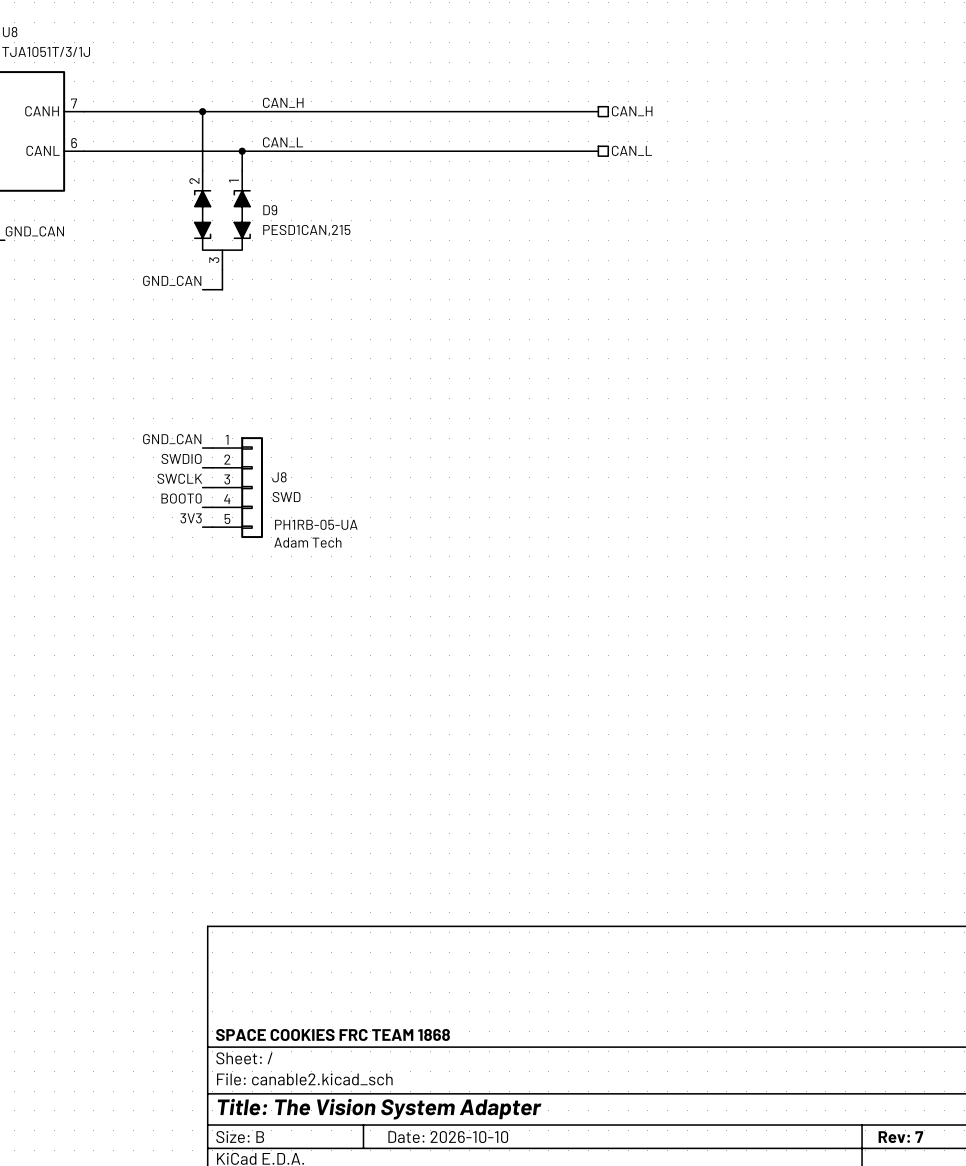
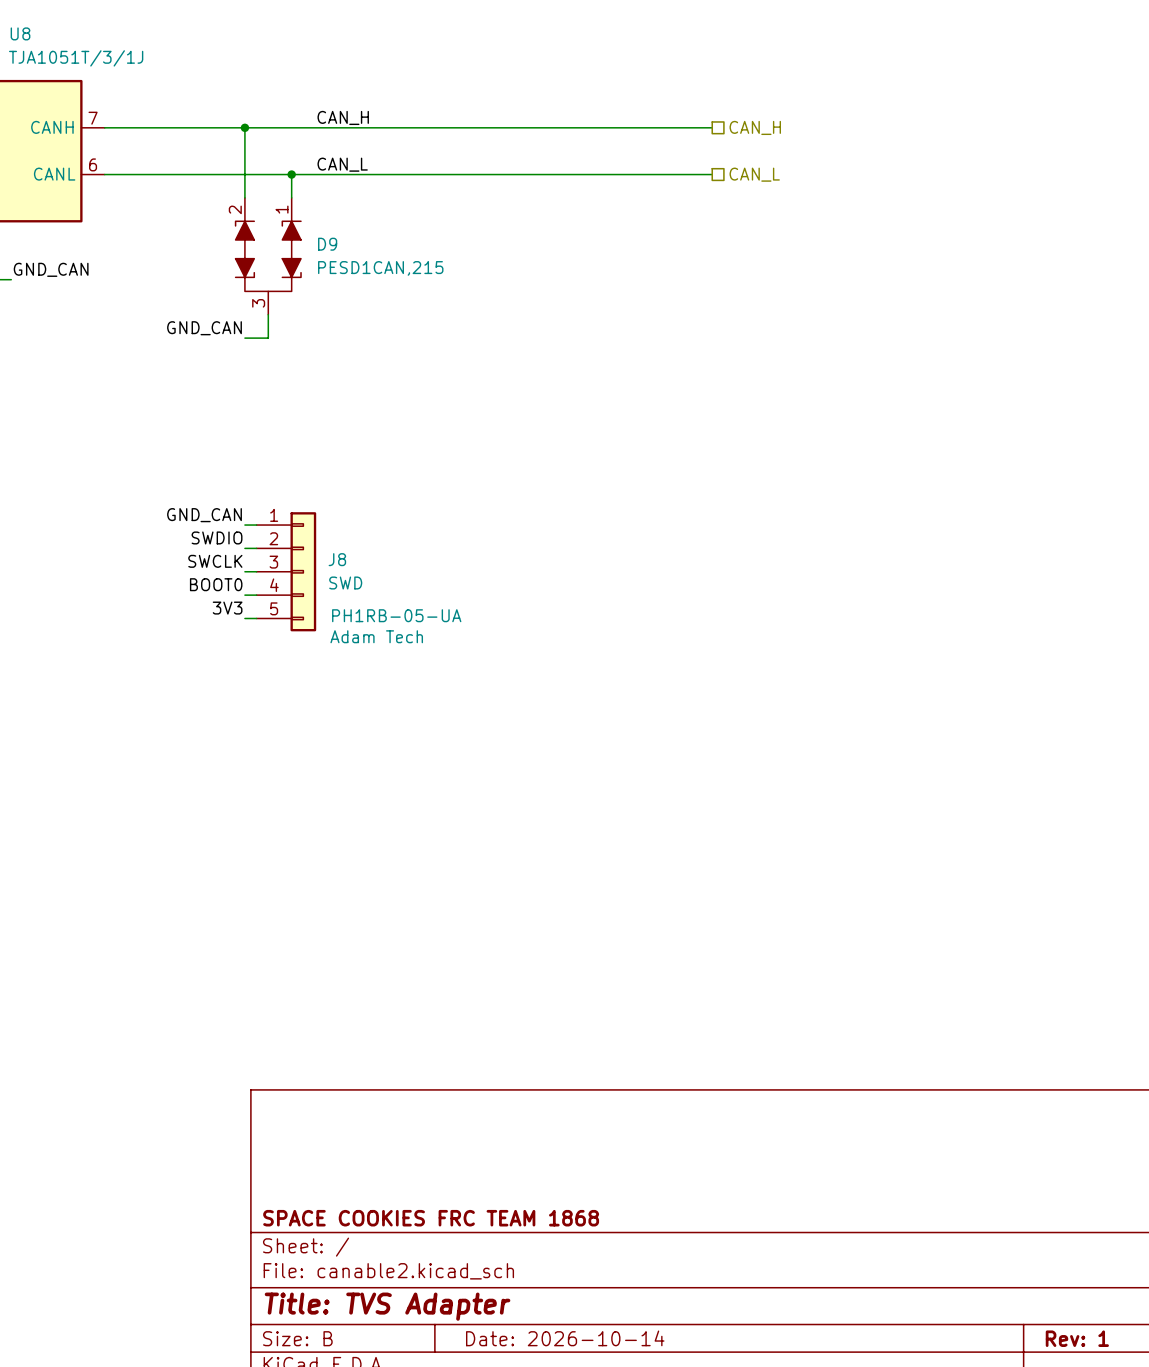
title block: Title: The Vision System Adapter (379, 1109) -> Title: TVS Adapter (387, 1306)
title block: Date: 2026-10-10 (448, 1137) -> Date: 2026-10-14 (565, 1338)
title block: Rev: 7 (900, 1137) -> Rev: 1 (1077, 1338)

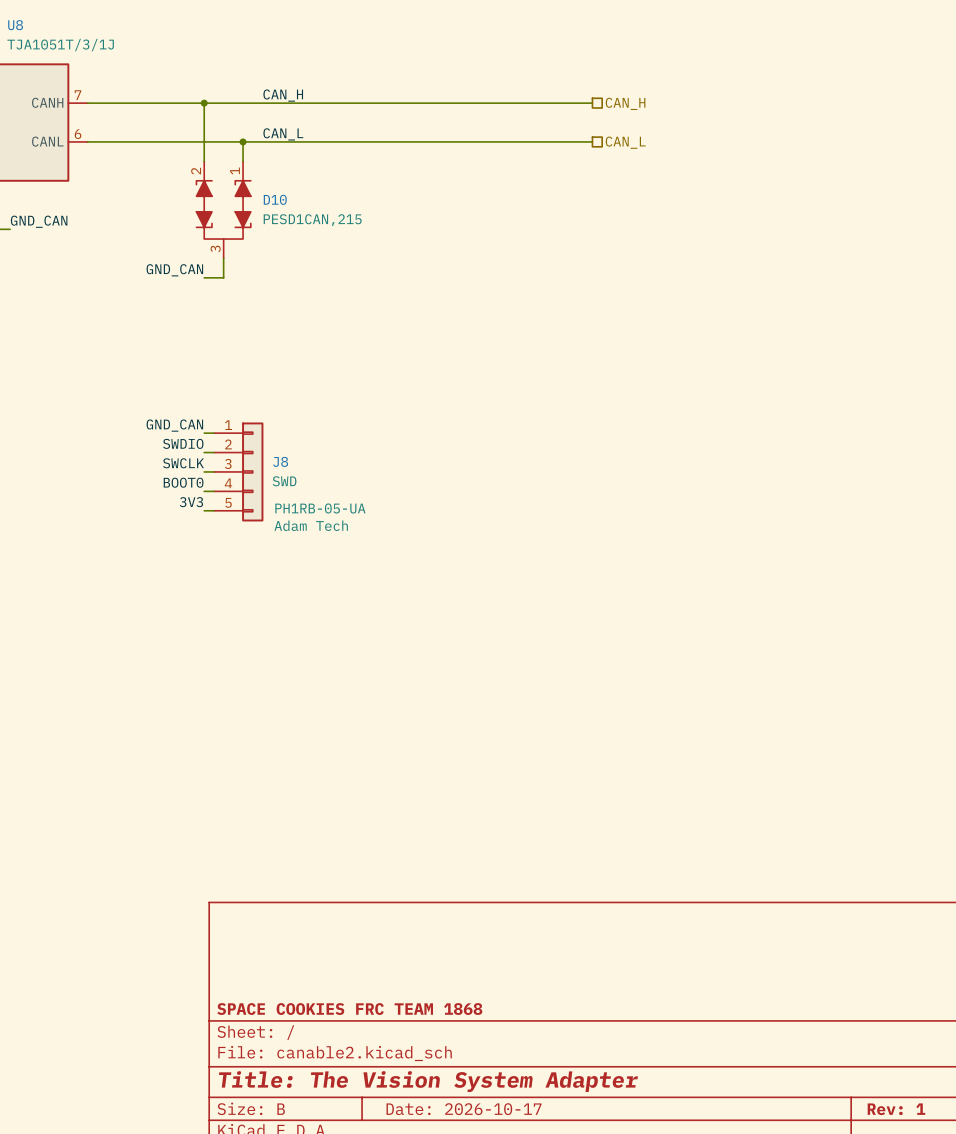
D9 name: D9 (327, 244) -> D10 (275, 199)
title block: Title: TVS Adapter (387, 1306) -> Title: The Vision System Adapter (428, 1081)
title block: Date: 2026-10-14 (565, 1338) -> Date: 2026-10-17 (464, 1109)

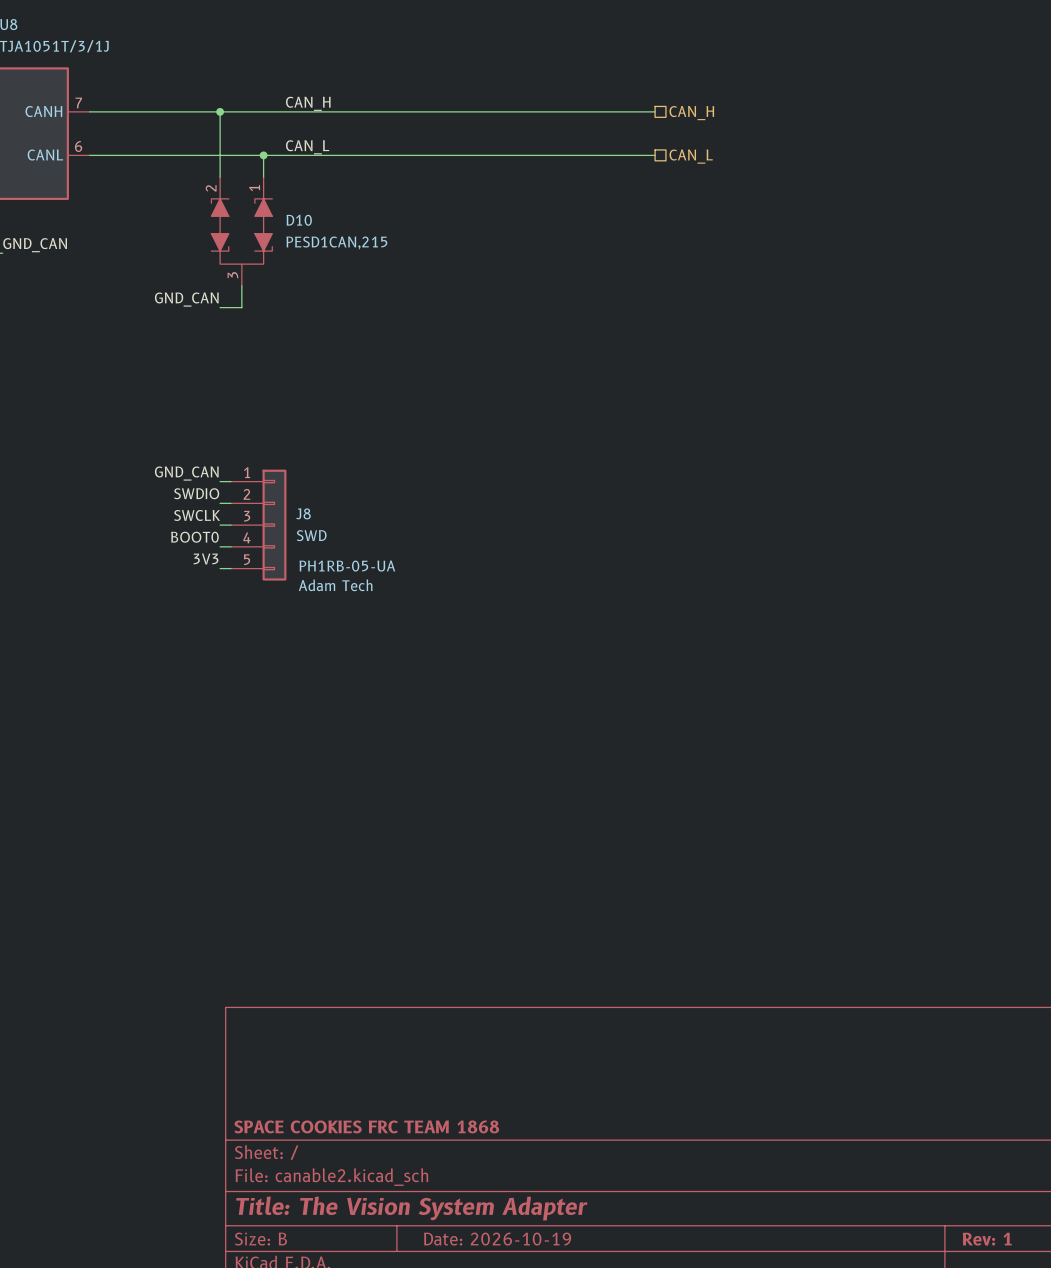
title block: Date: 2026-10-17 (464, 1109) -> Date: 2026-10-19 (497, 1239)

